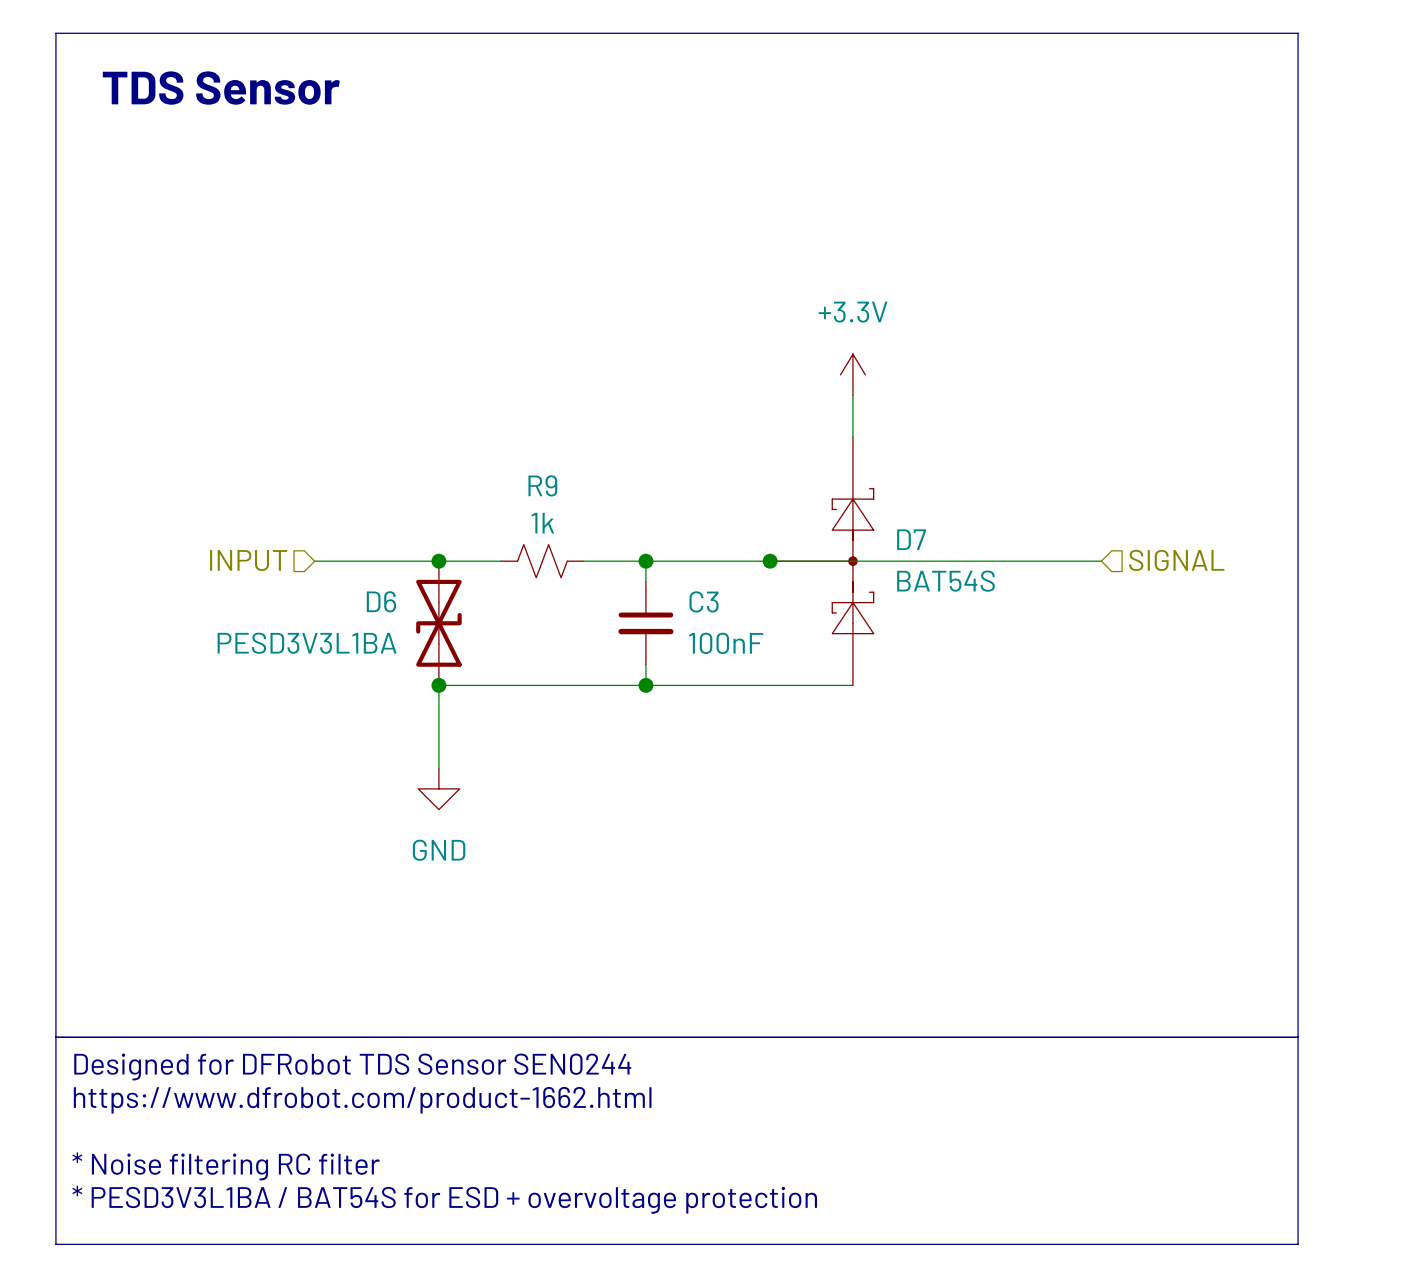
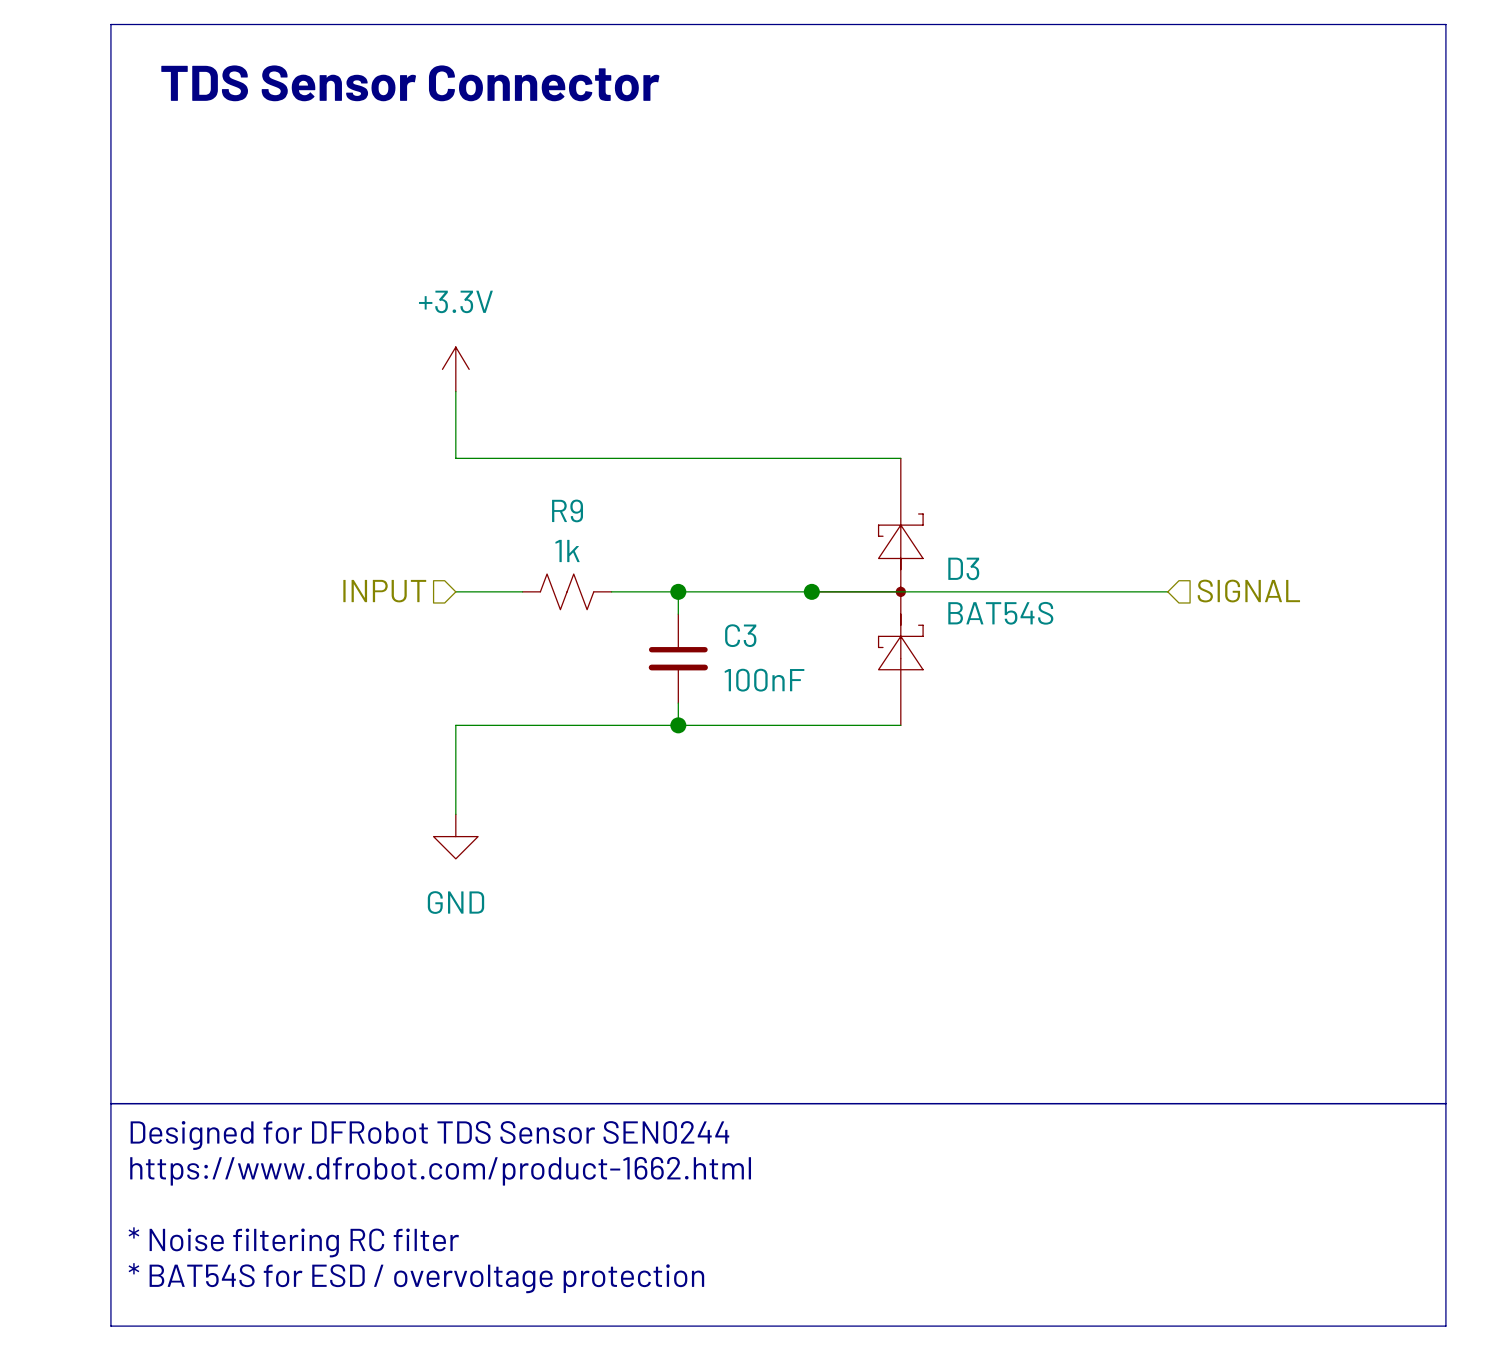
line: (118, 33) (55, 33) (55, 1244) (118, 1244) -> (110, 24) (110, 1326)
line: (1298, 33) (1298, 1244) -> (1379, 24) (1445, 24) (1445, 1326) (1379, 1326)
text: TDS Sensor (221, 88) -> TDS Sensor Connector (410, 83)
power symbol: none -> +3.3V (455, 369)
power symbol: +3.3V (852, 374) -> none
wire: (852, 395) (852, 436) -> (455, 391) (455, 458) (900, 458)
D7 name: D7 (911, 539) -> D3 (963, 568)
hierarchical label position: INPUT (248, 560) -> INPUT (384, 591)
wire: (314, 561) (438, 561) -> none
junction: (438, 561) -> none
D6: PESD3V3L1BA (438, 623) -> none
junction: (438, 685) -> none
line: (55, 1037) (118, 1037) -> none
line: none -> (1379, 1103) (1445, 1103)
text position: Designed for DFRobot TDS Sensor SEN0244 (352, 1066) -> Designed for DFRobot TDS Sensor SEN0244 (429, 1135)
text position: https://www.dfrobot.com/product-1662.html (362, 1100) -> https://www.dfrobot.com/product-1662.html (440, 1171)
text position: * Noise filtering RC filter (226, 1166) -> * Noise filtering RC filter (293, 1242)
text: * PESD3V3L1BA / BAT54S for ESD + overvoltage protection (444, 1199) -> * BAT54S for ESD / overvoltage protection (416, 1278)

